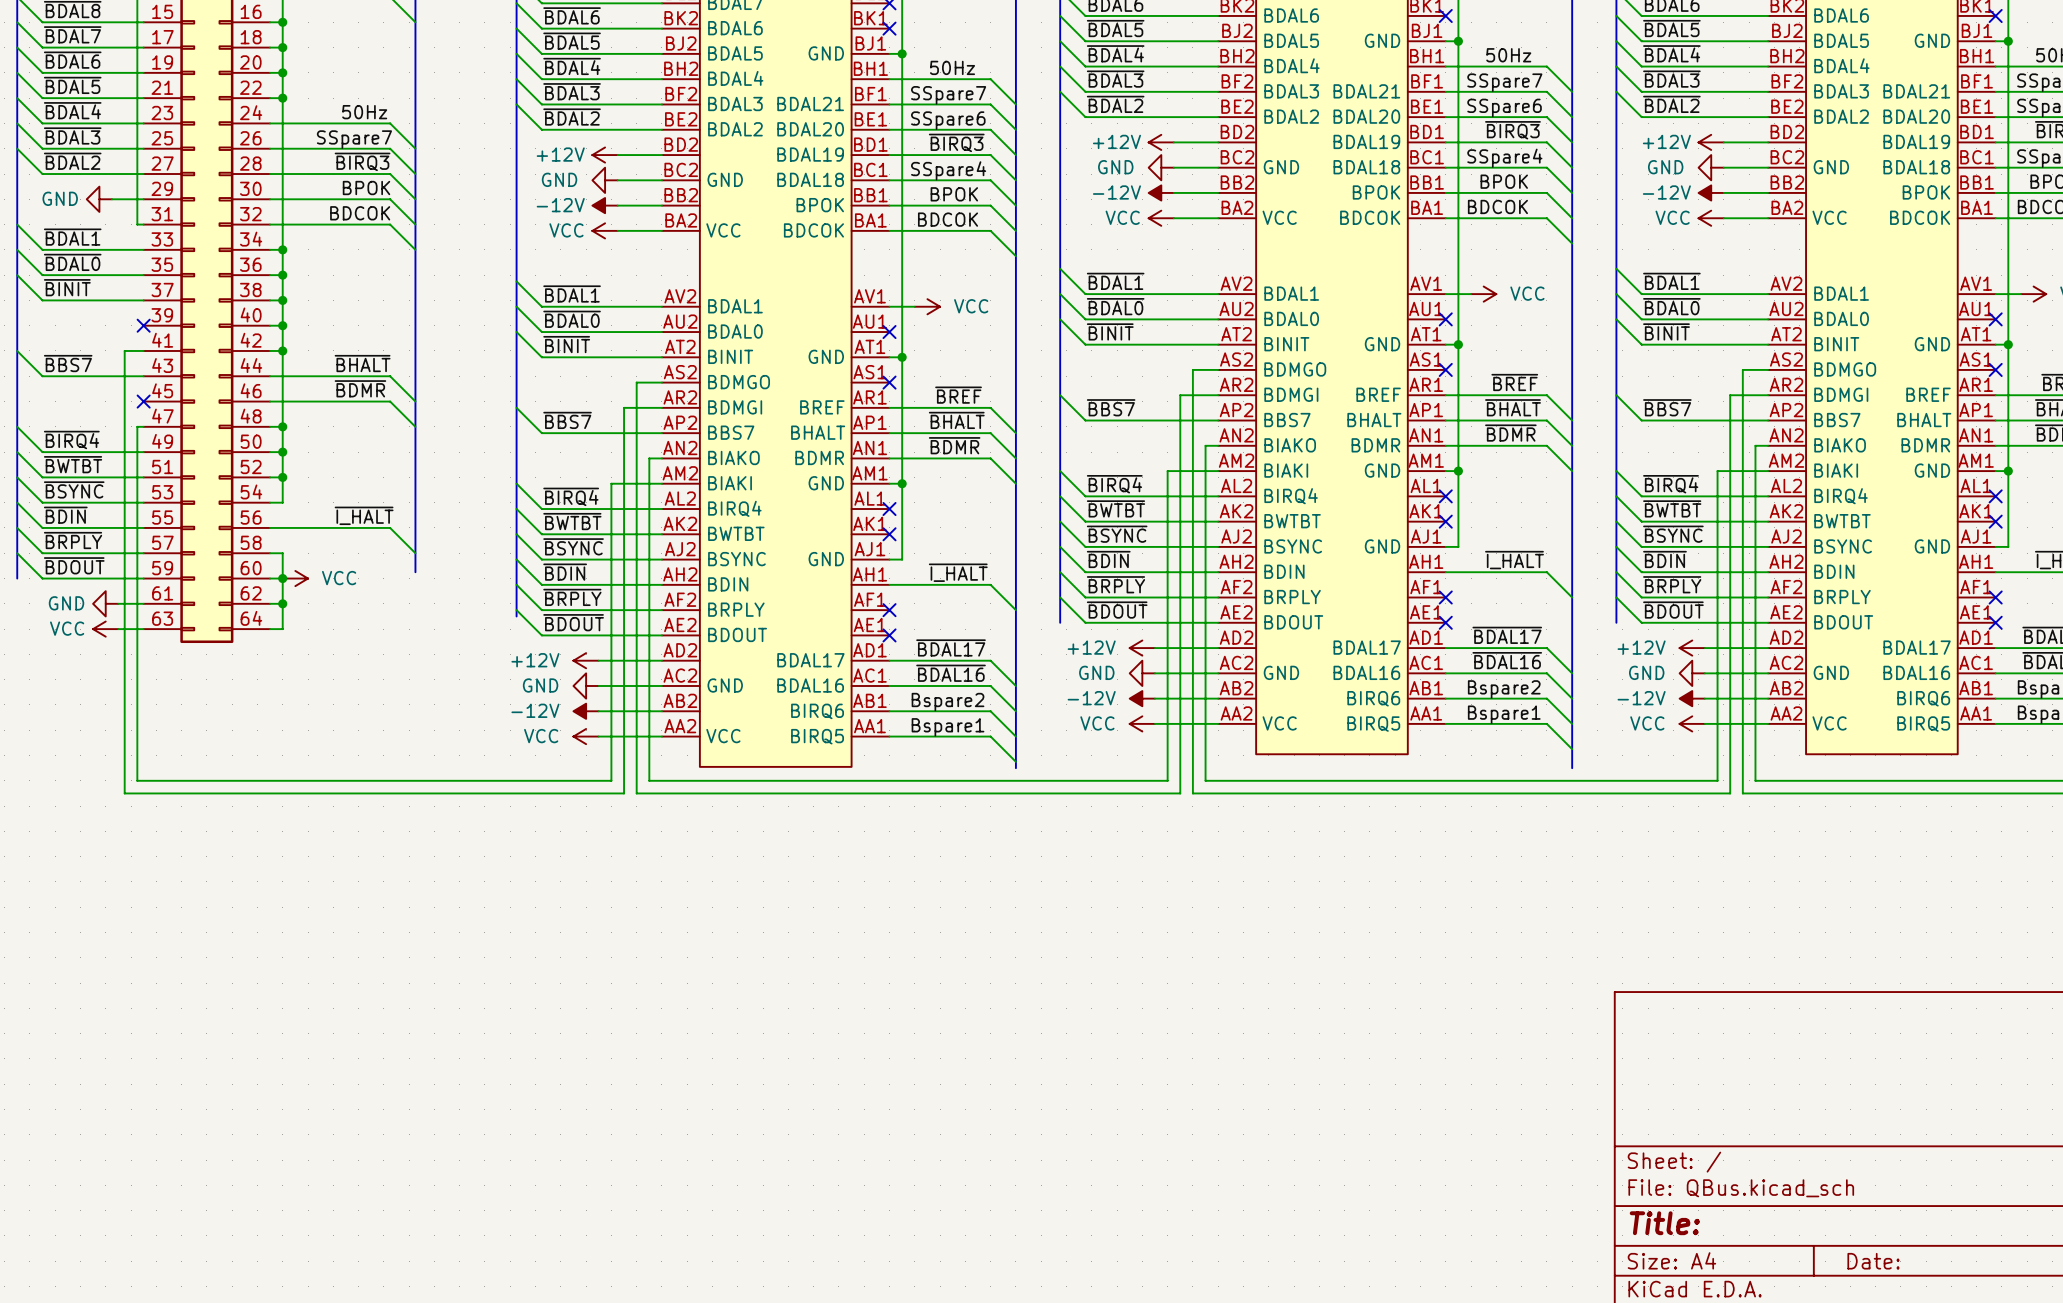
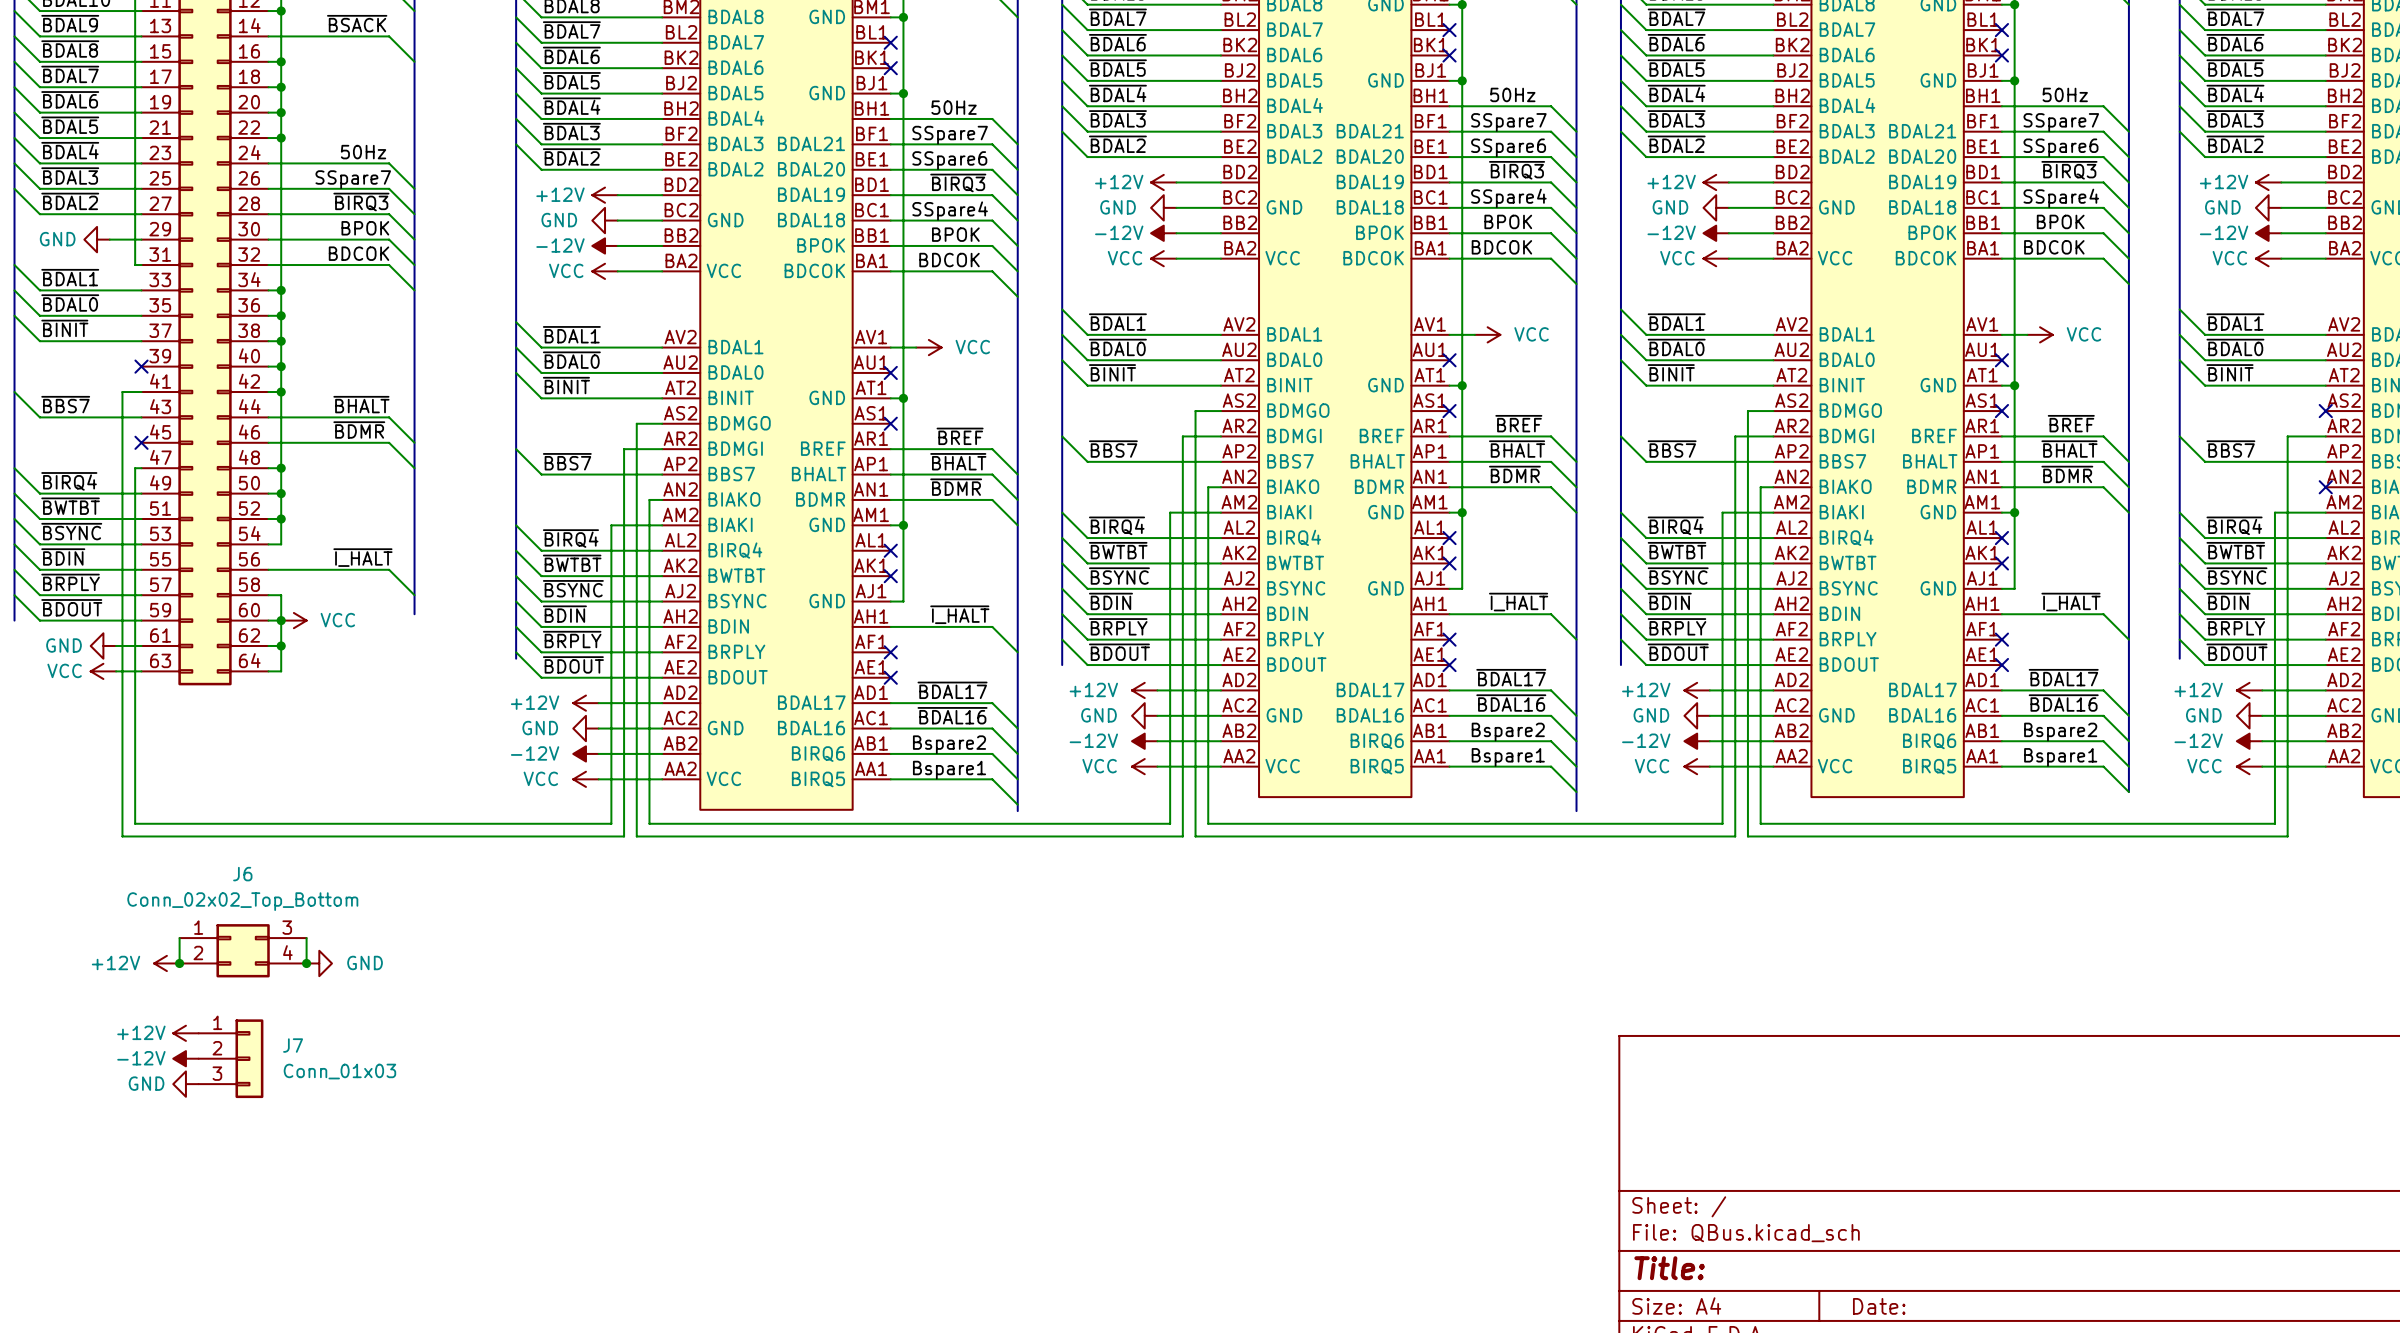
wire: none -> (179, 938) (179, 963)
wire: none -> (306, 938) (306, 963)
J6: none -> Conn_02x02_Top_Bottom (243, 950)
power symbol: none -> +12V (166, 963)
junction: none -> (179, 963)
junction: none -> (306, 963)
power symbol: none -> GND (319, 963)
power symbol: none -> +12V (185, 1033)
power symbol: none -> -12V (185, 1058)
J7: none -> Conn_01x03 (231, 1058)
power symbol: none -> GND (185, 1084)

